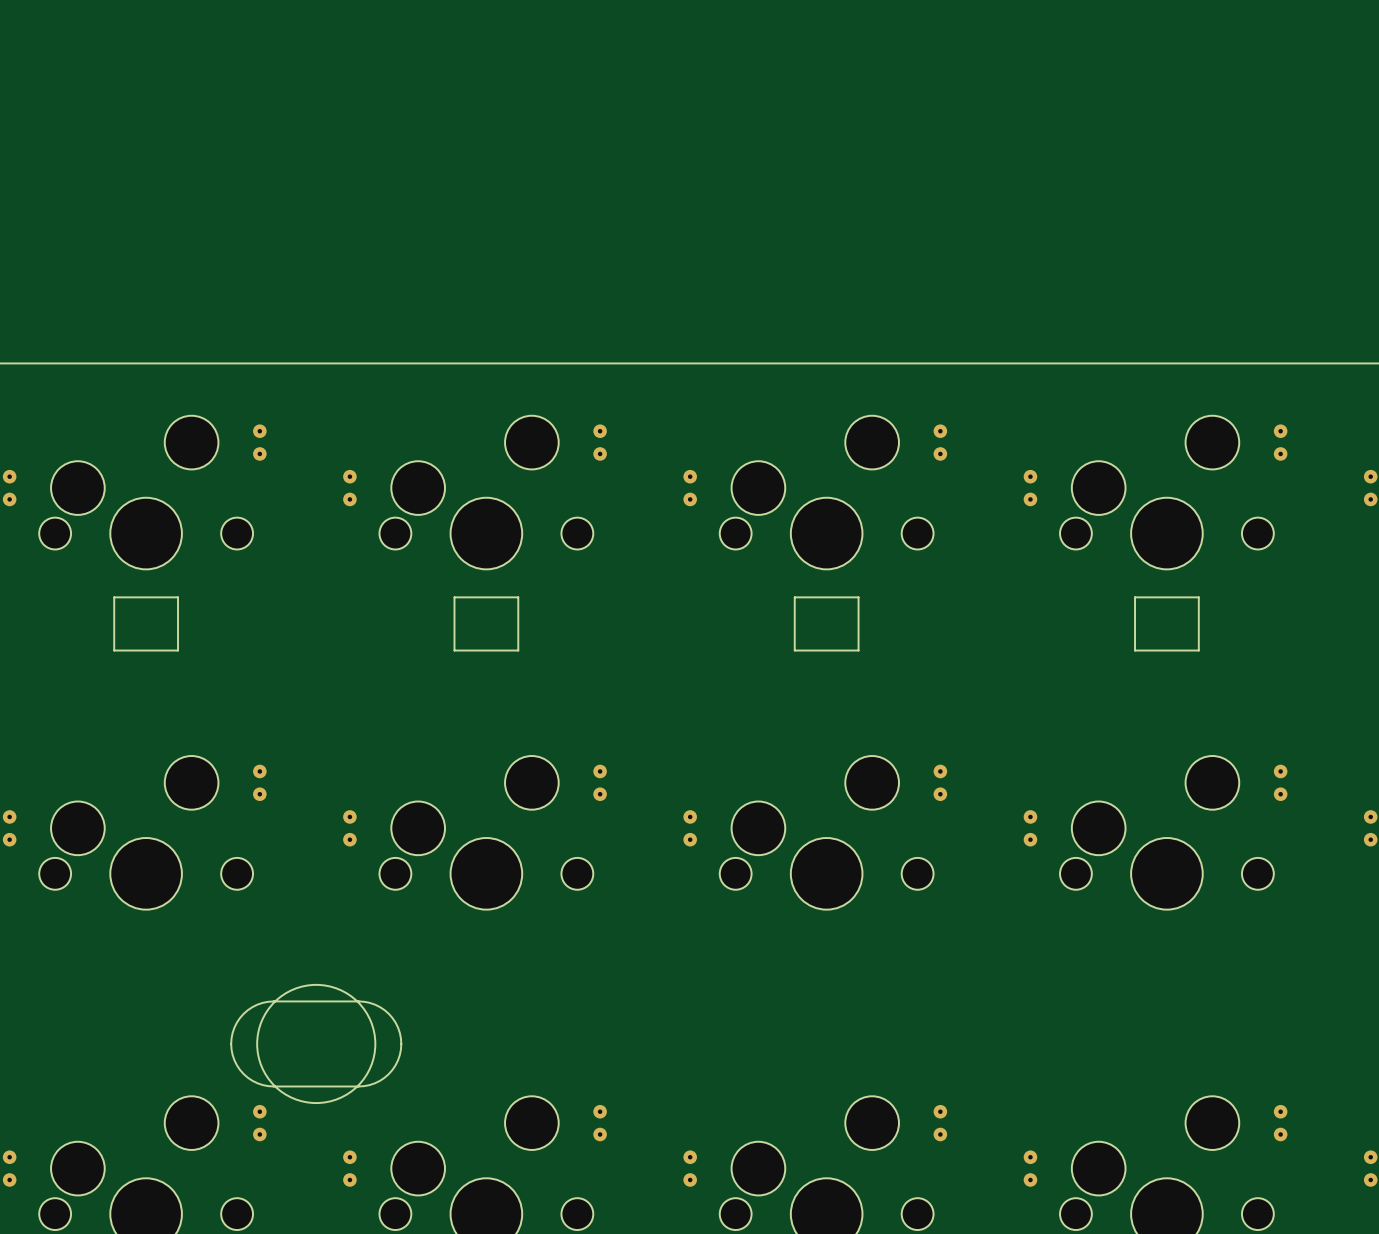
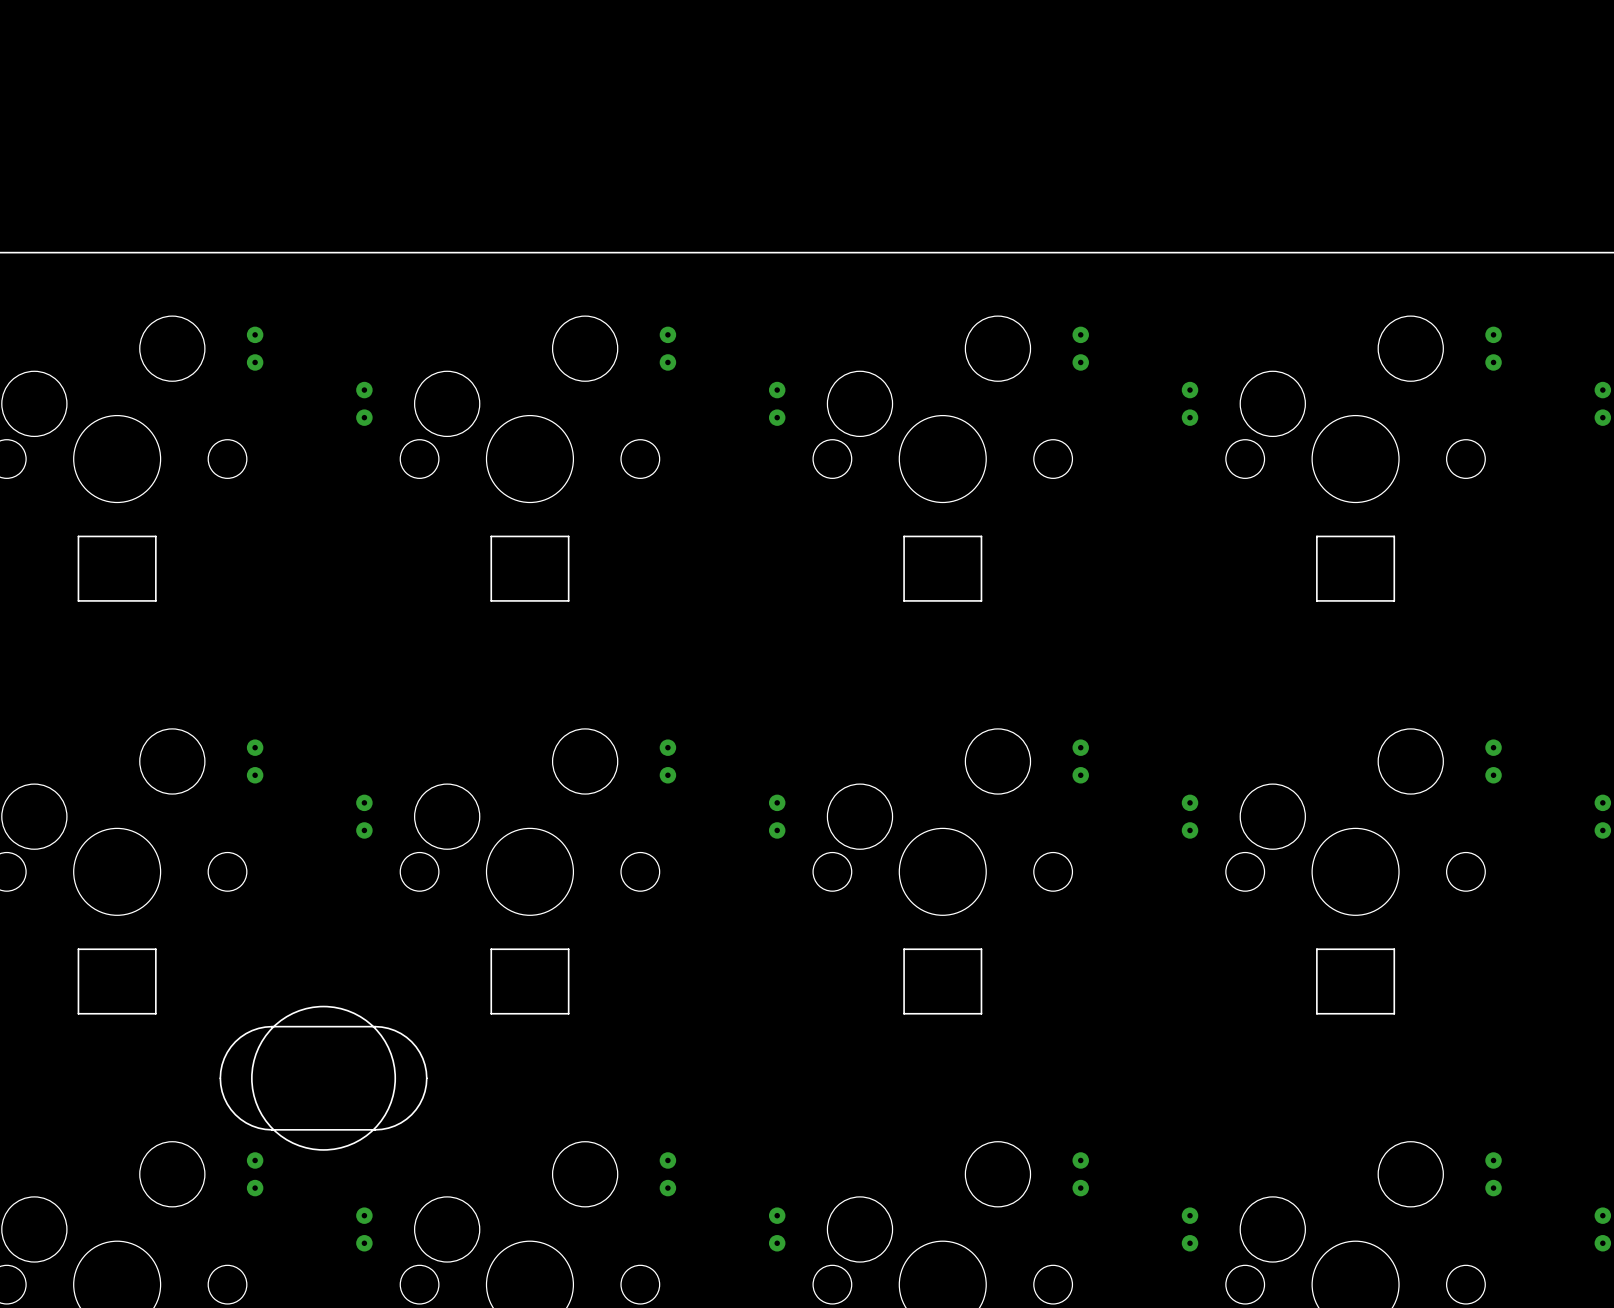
board edge: none -> (78, 949) (155, 949) (155, 1013) (78, 1013) (78, 949)
board edge: none -> (491, 949) (568, 949) (568, 1013) (491, 1013) (491, 949)
board edge: none -> (904, 949) (981, 949) (981, 1013) (904, 1013) (904, 949)
board edge: none -> (1316, 949) (1394, 949) (1394, 1013) (1316, 1013) (1316, 949)

